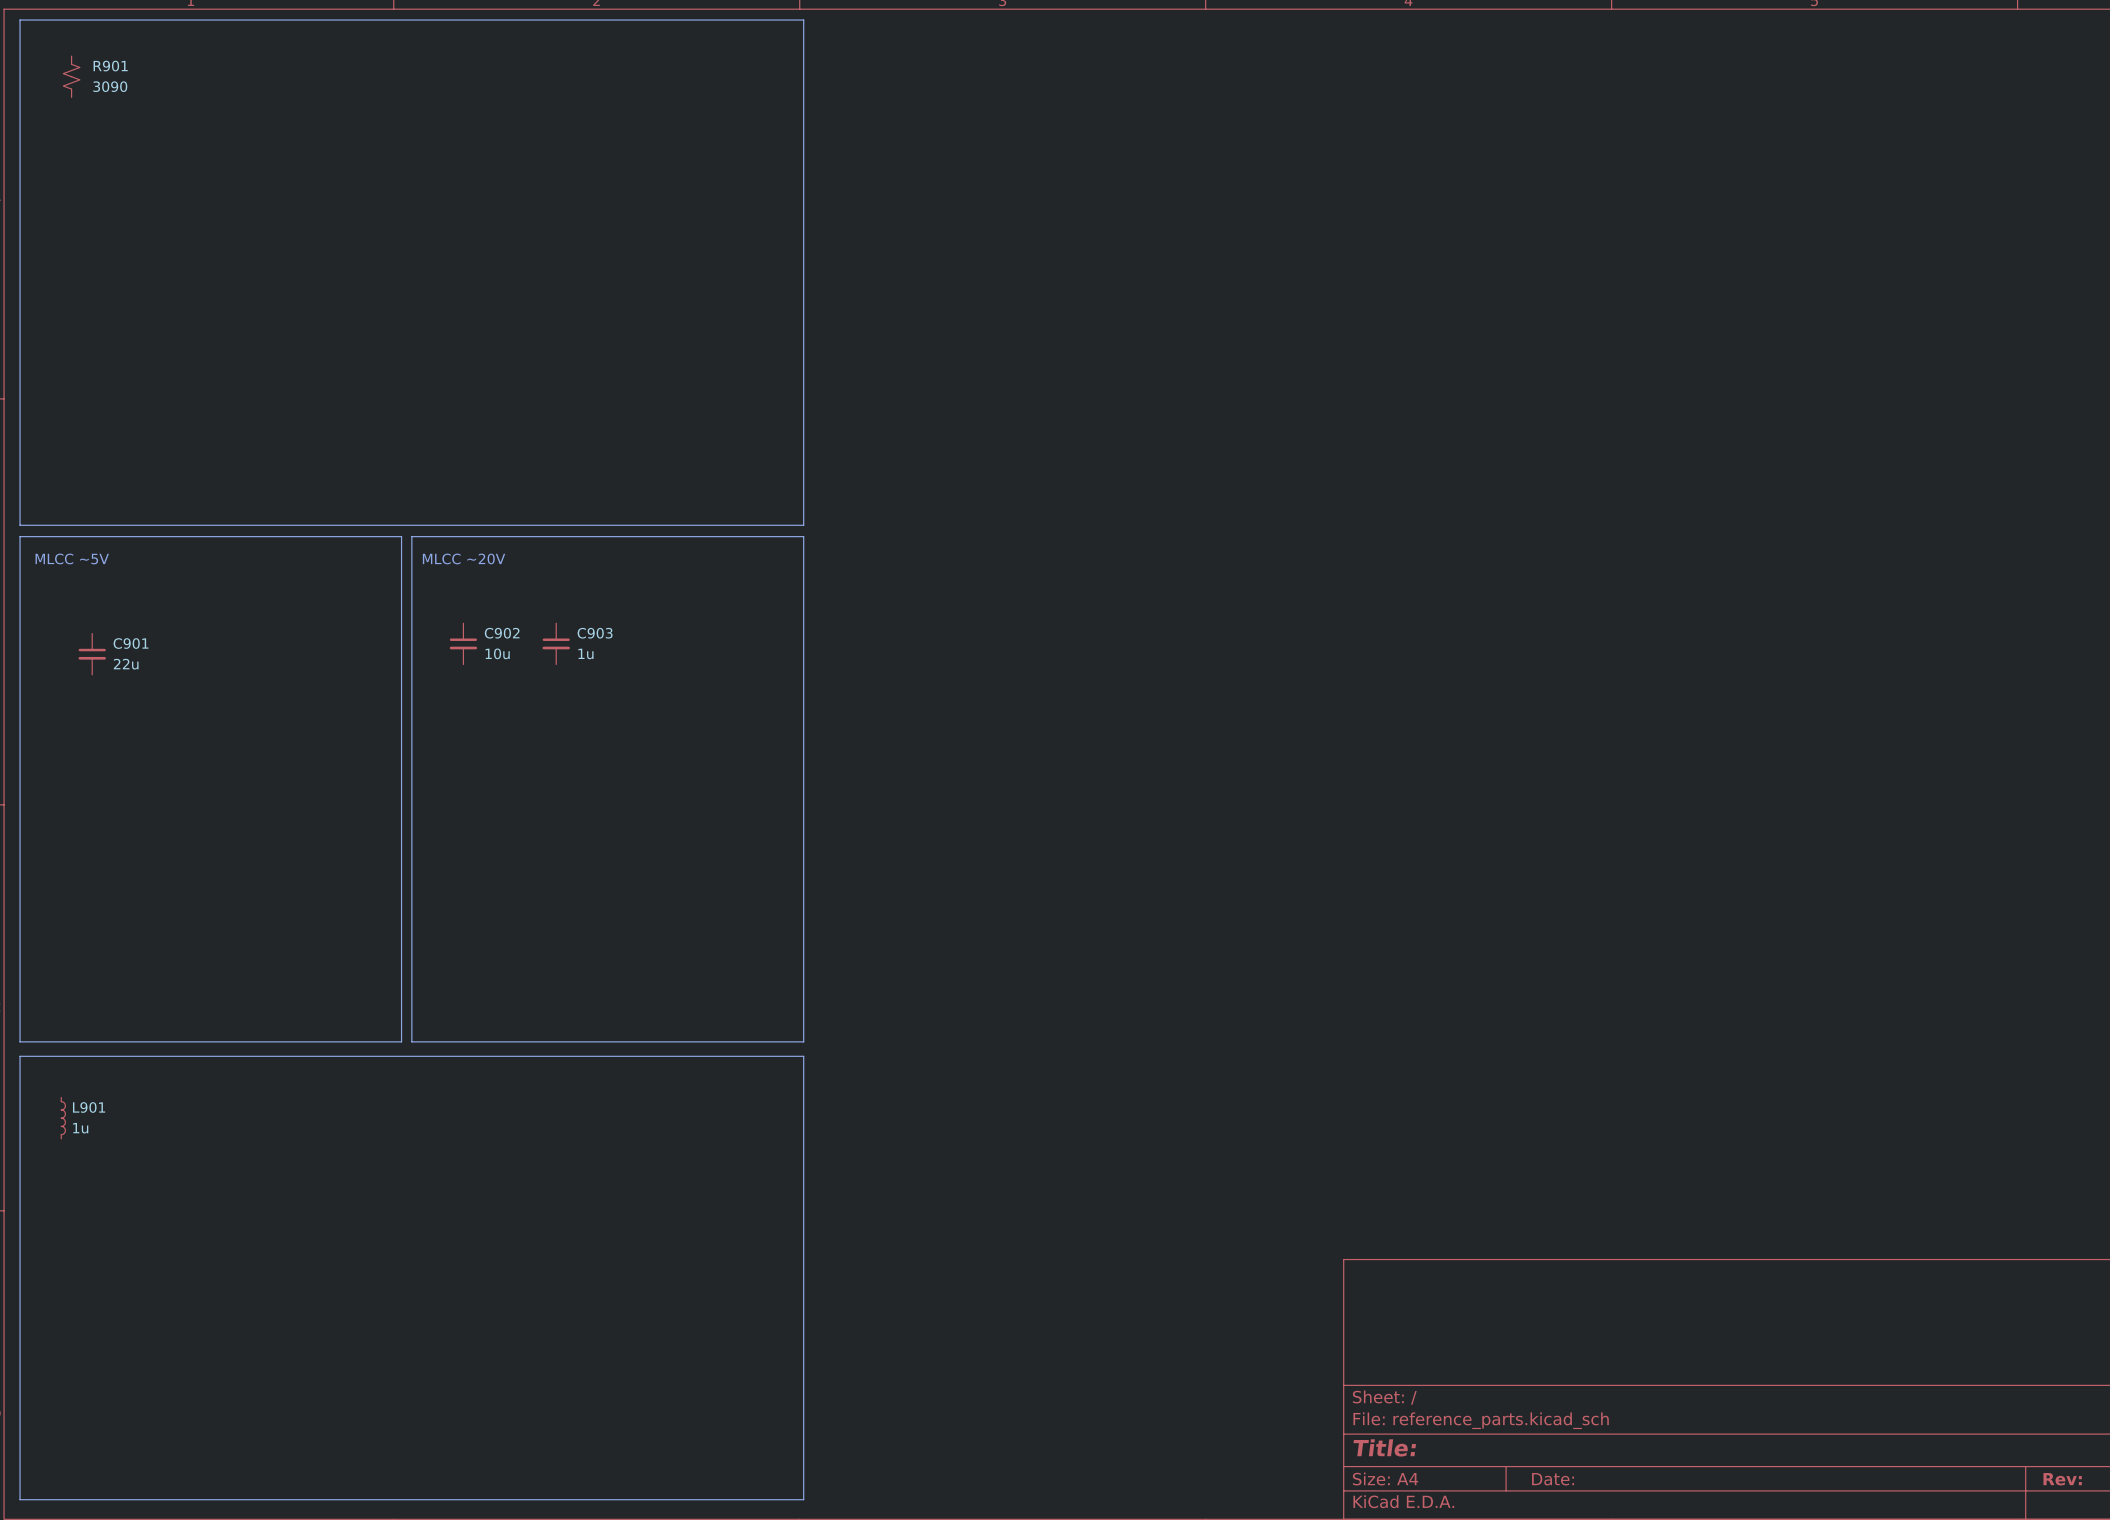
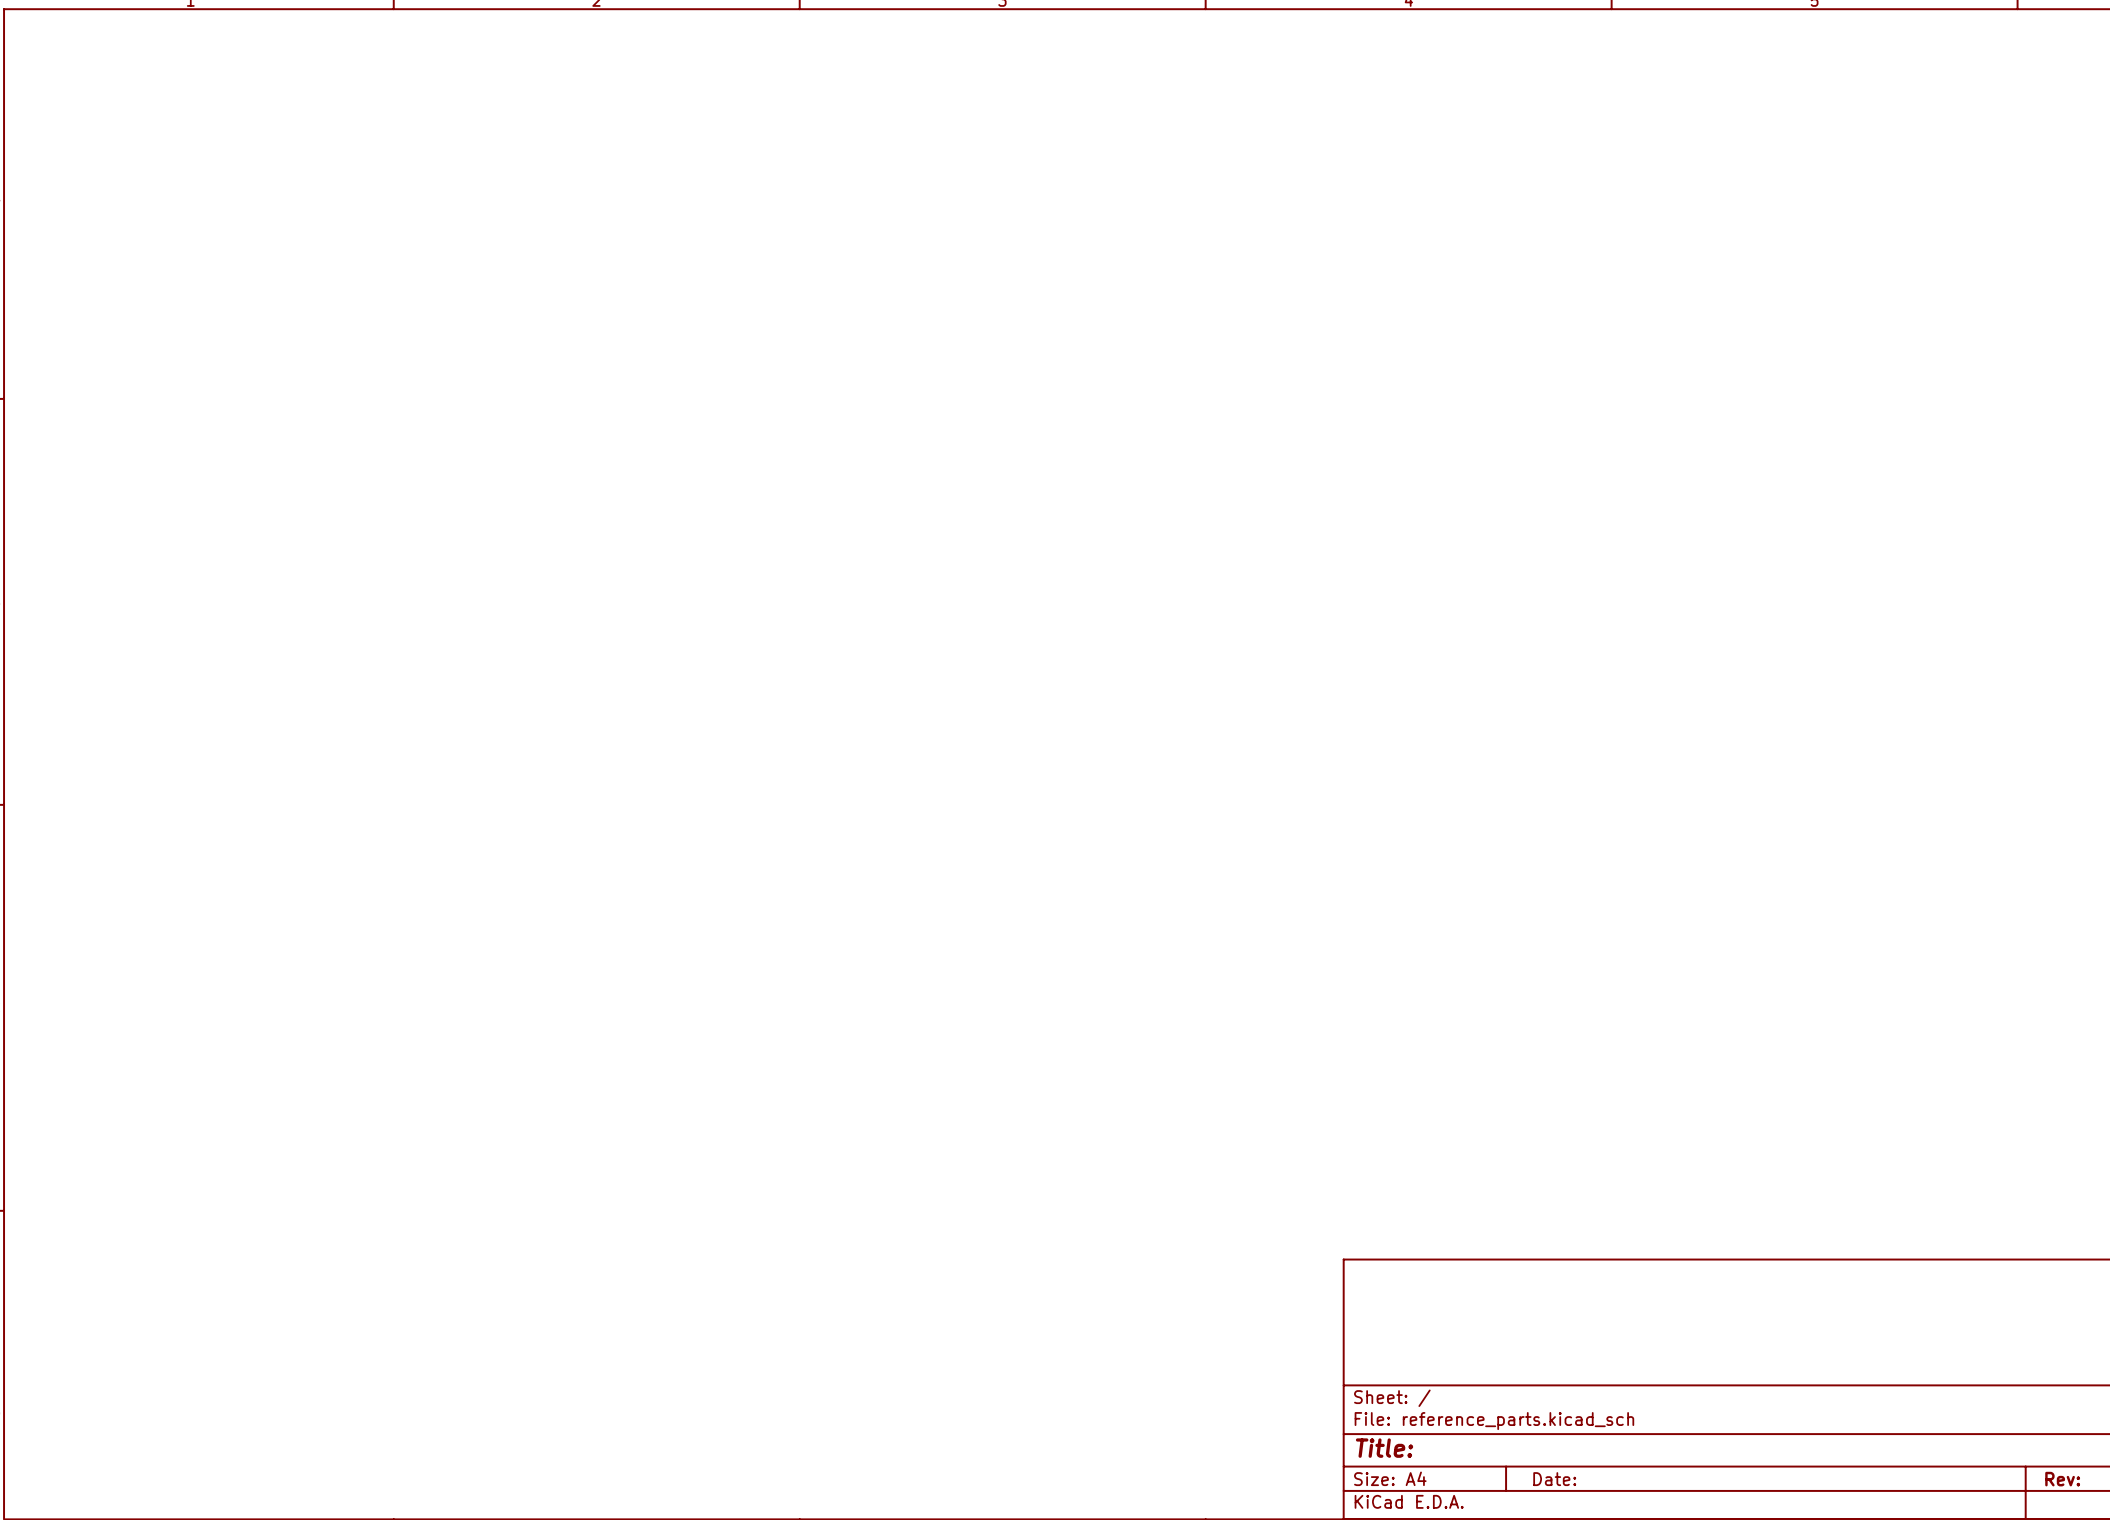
line: (20, 20) (803, 20) (803, 525) (20, 525) (20, 20) -> none
R901: 3090 (71, 76) -> none
line: (20, 536) (20, 1041) (401, 1041) (401, 536) (20, 536) -> none
line: (411, 536) (803, 536) (803, 1041) (411, 1041) (411, 536) -> none
text: MLCC ~5V (72, 558) -> none
text: MLCC ~20V (464, 558) -> none
C902: 10u (463, 643) -> none
C903: 1u (556, 643) -> none
C901: 22u (92, 654) -> none
line: (20, 1056) (20, 1499) (803, 1499) (803, 1056) (20, 1056) -> none
L901: 1u (63, 1118) -> none

